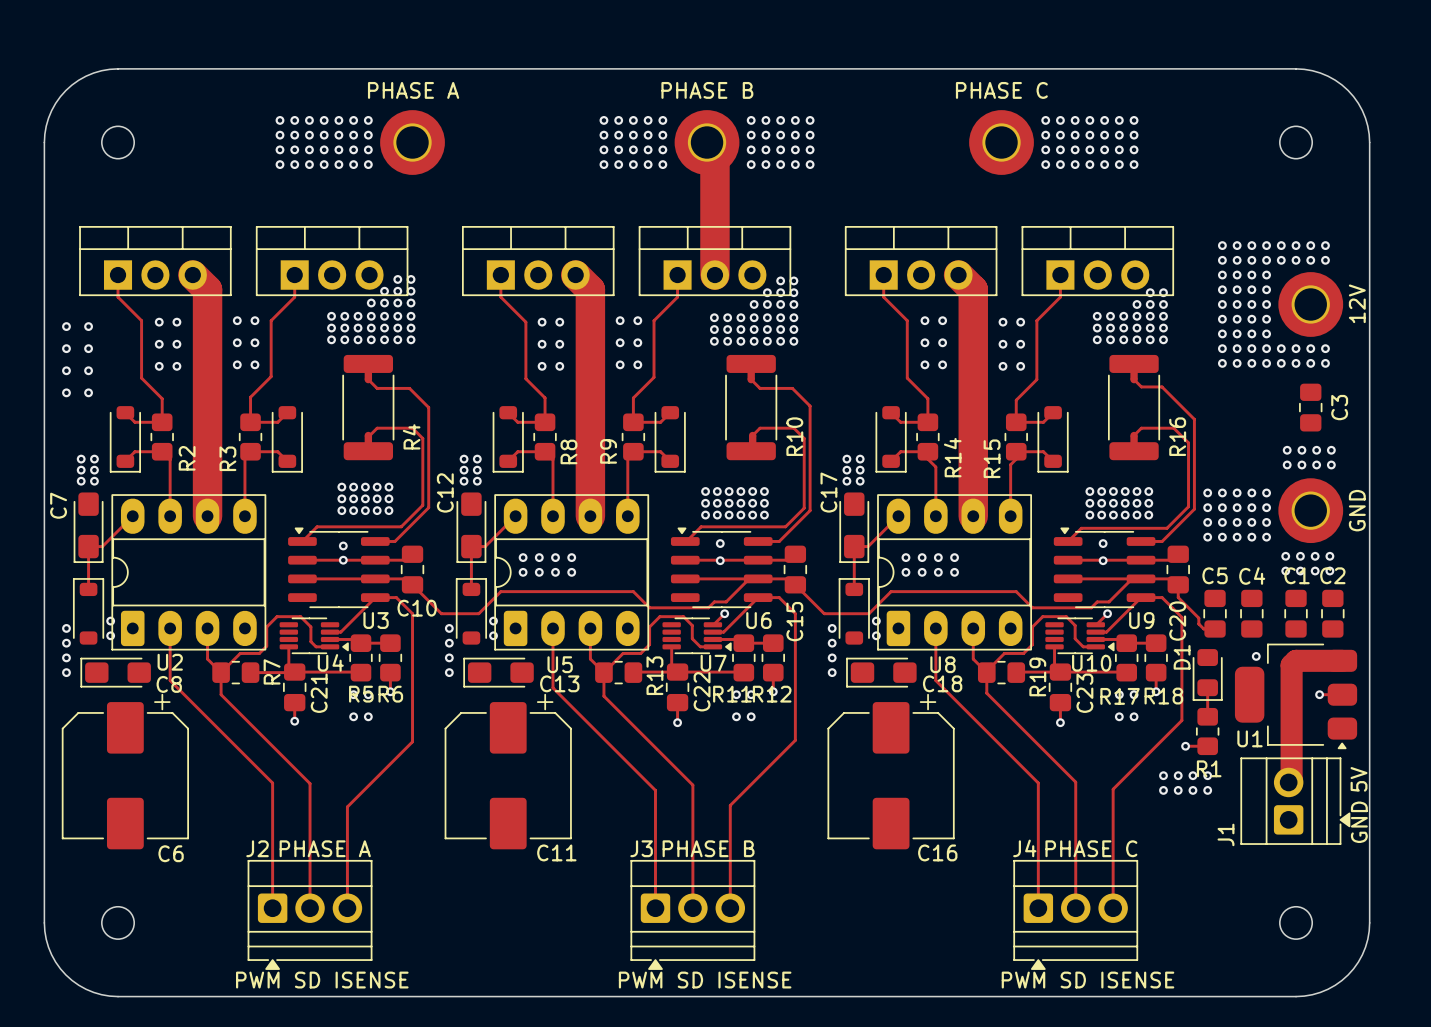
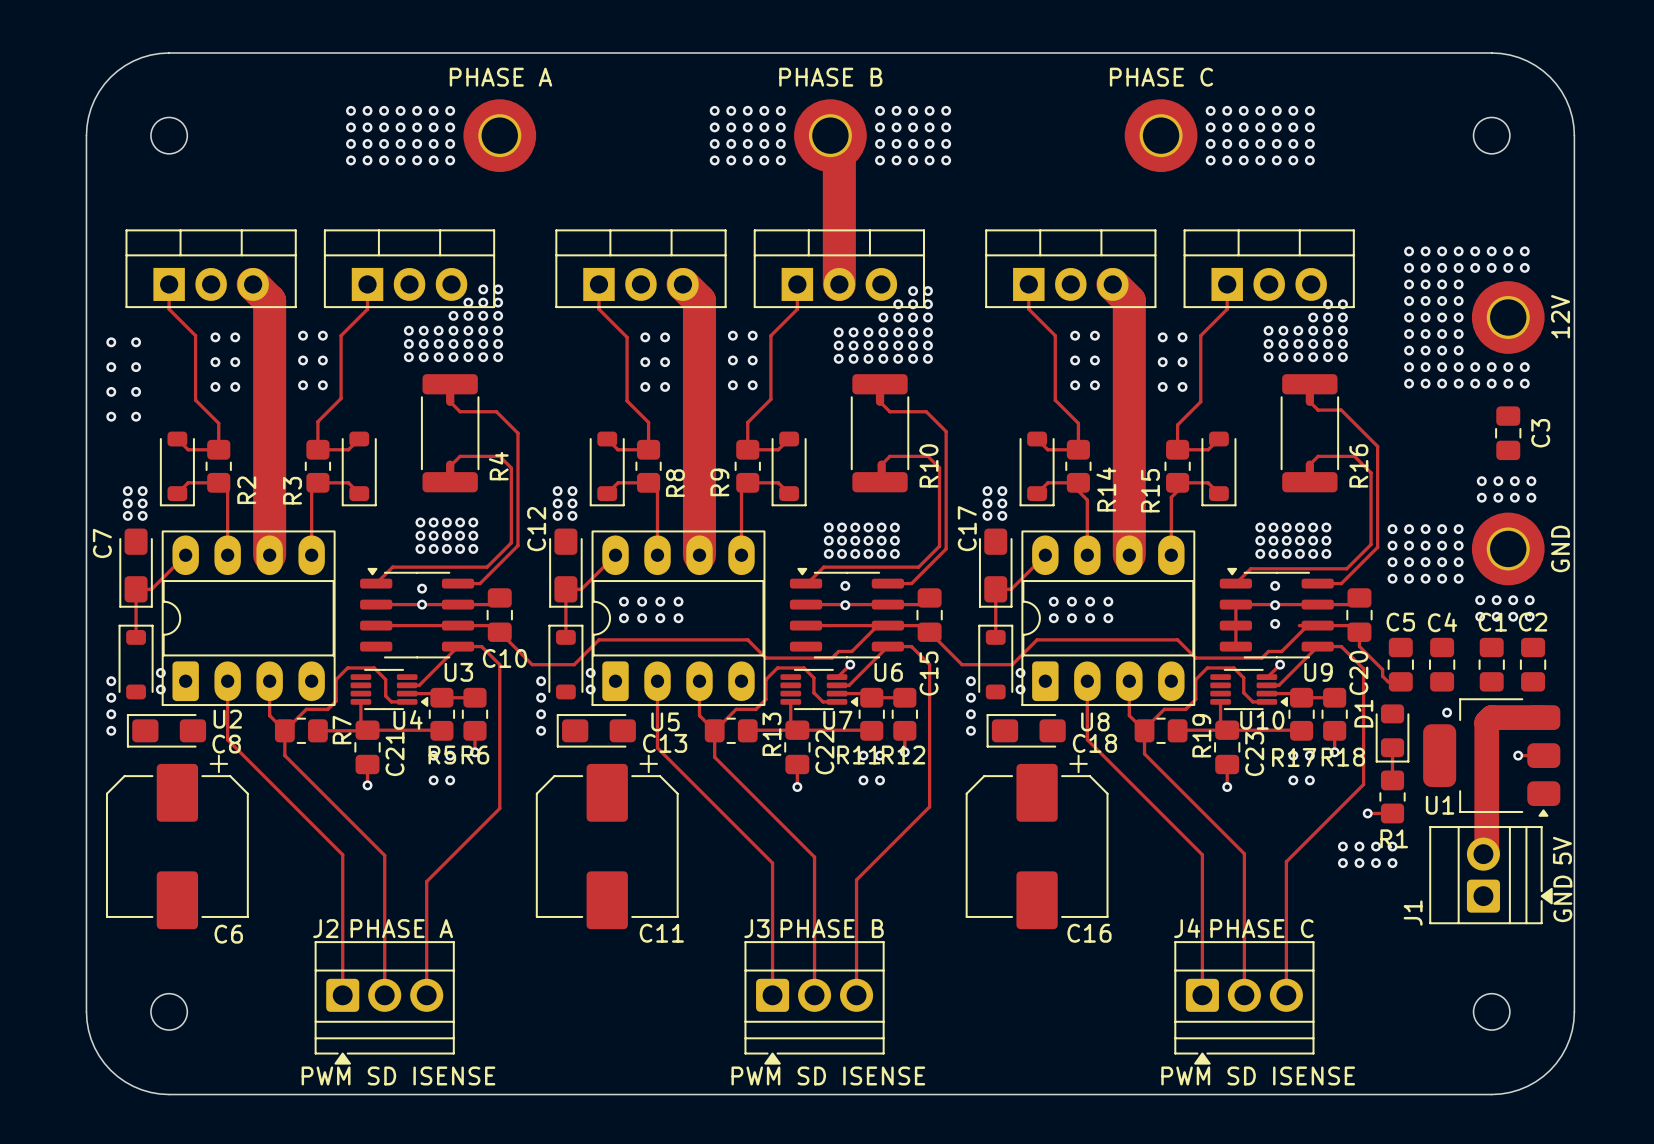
track: none -> (1235, 604) (1235, 646)
via: none -> (1275, 623)
track: (1068, 578) (1124, 578) -> none

